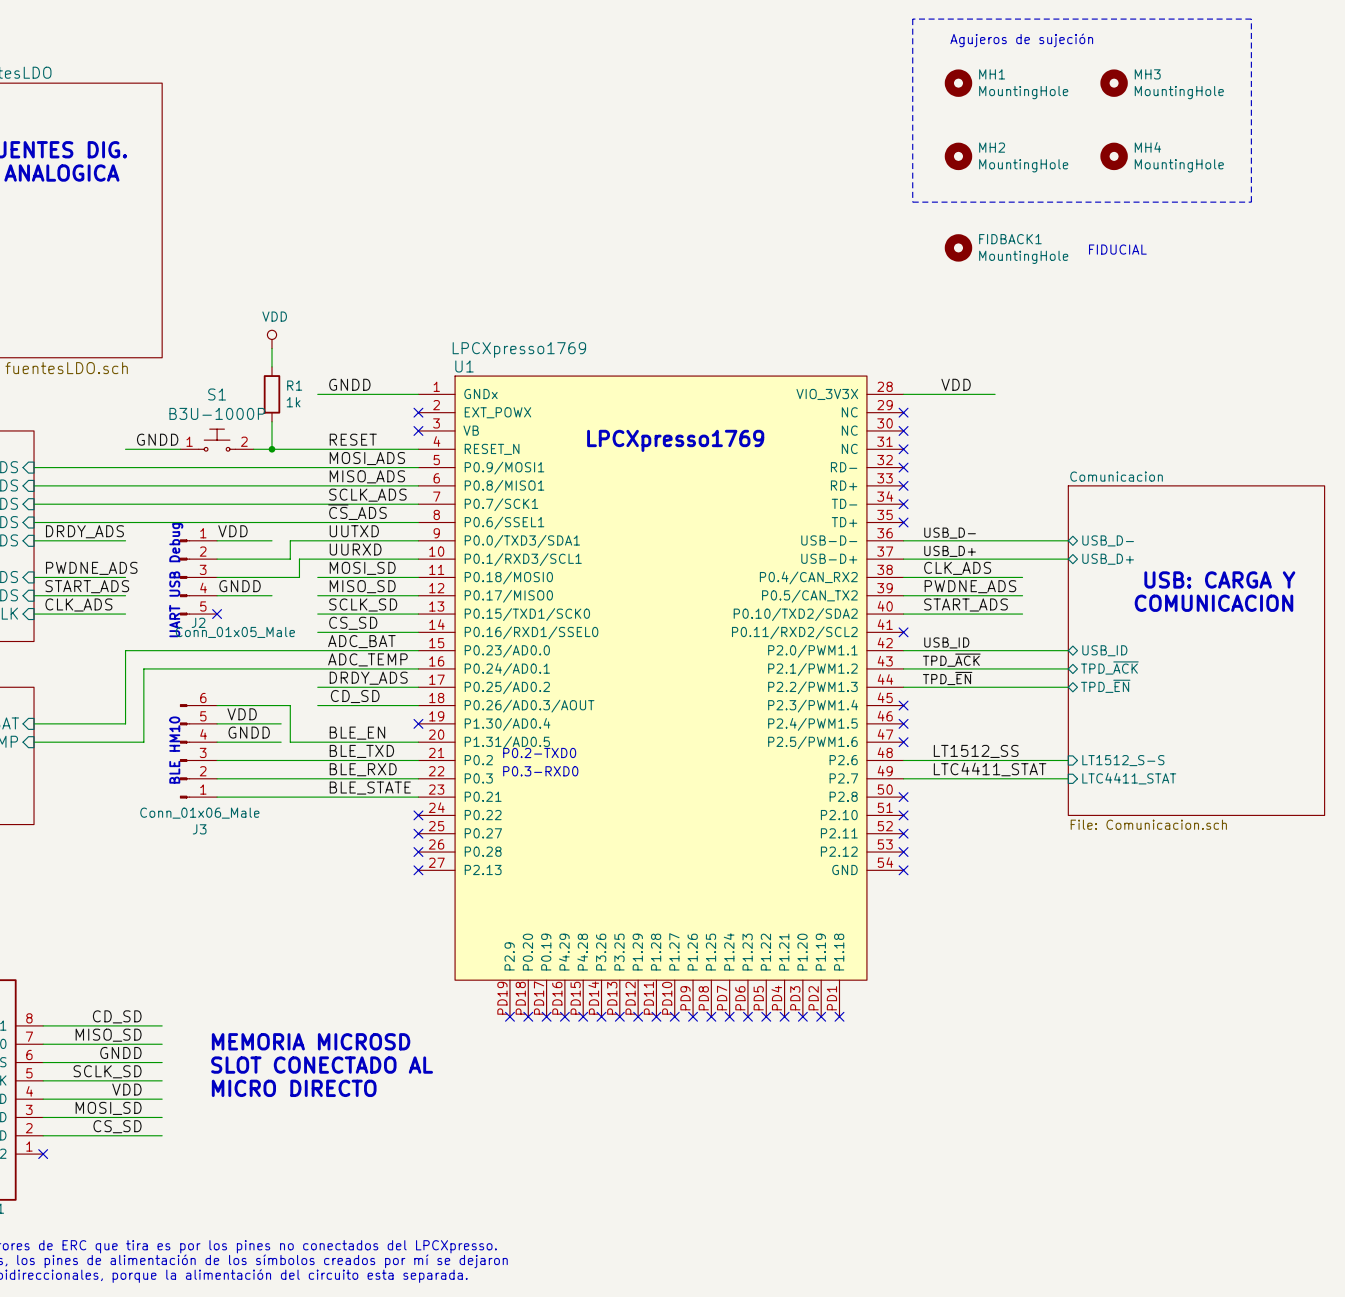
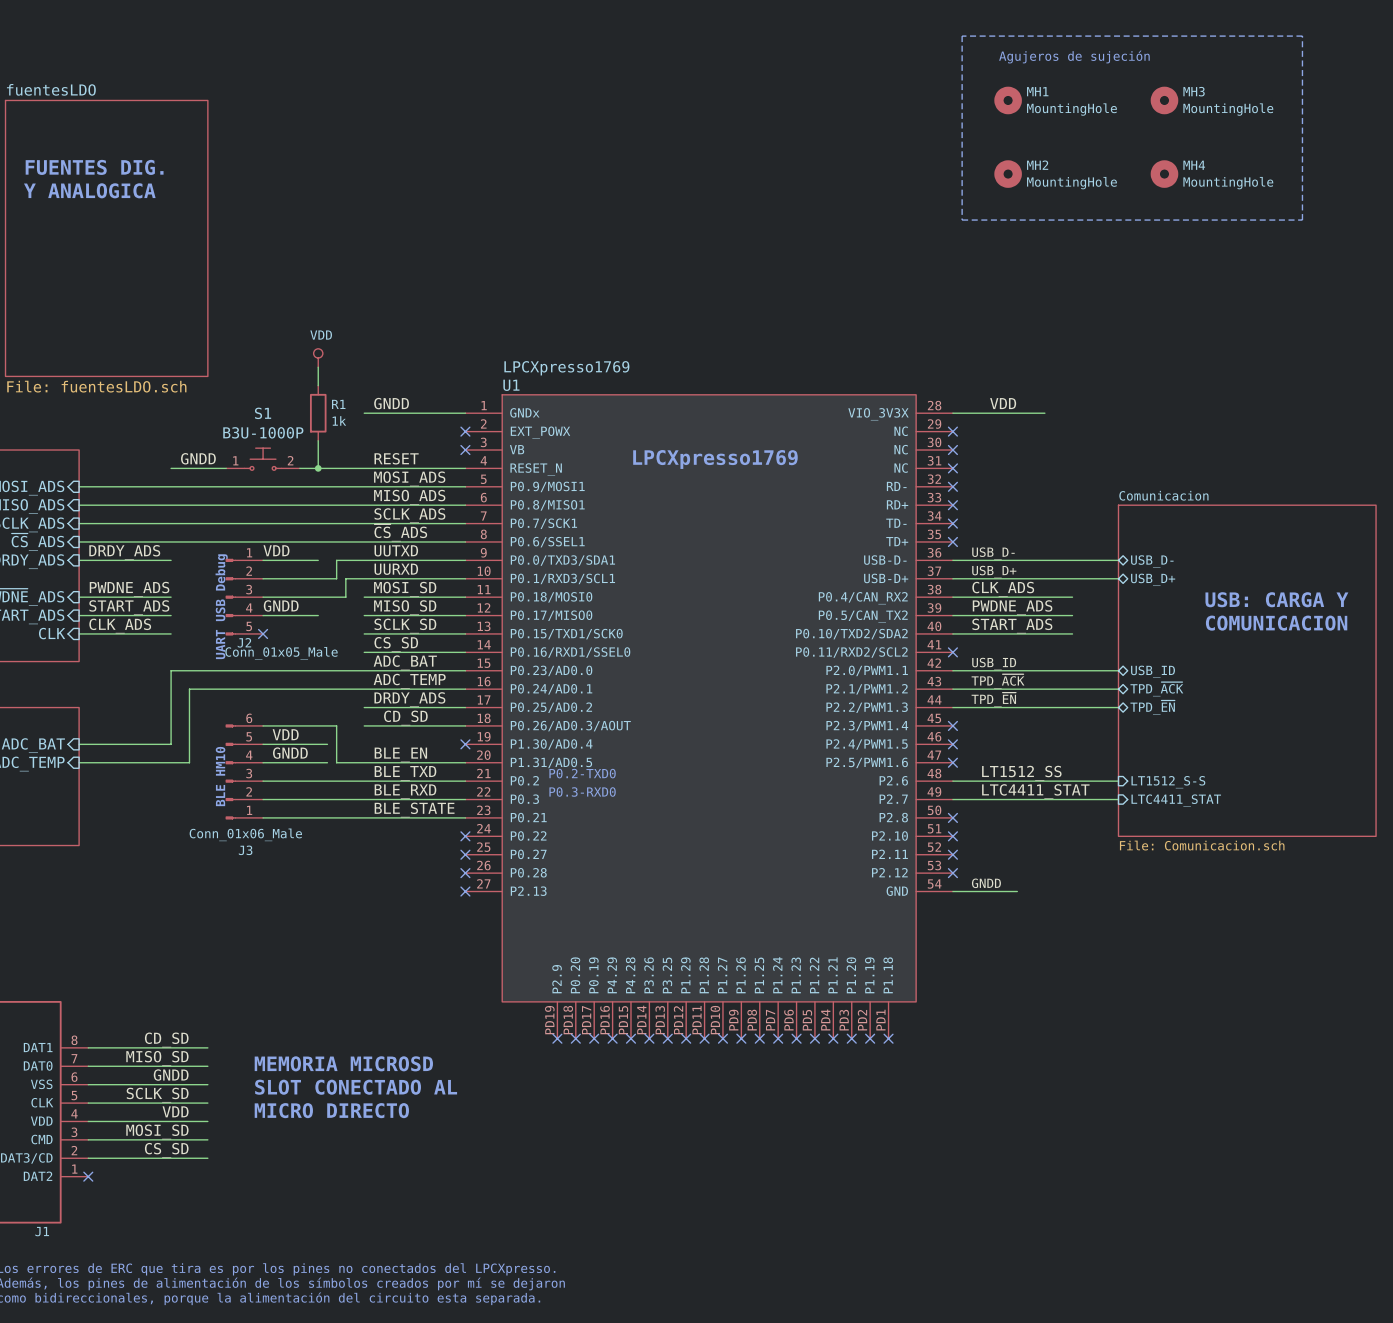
FIDBACK1: MountingHole (958, 247) -> none
text: FIDUCIAL (1117, 249) -> none
label: none -> GNDD (986, 883)
wire: none -> (952, 891) (1017, 891)
no-connect mark: (903, 870) -> none

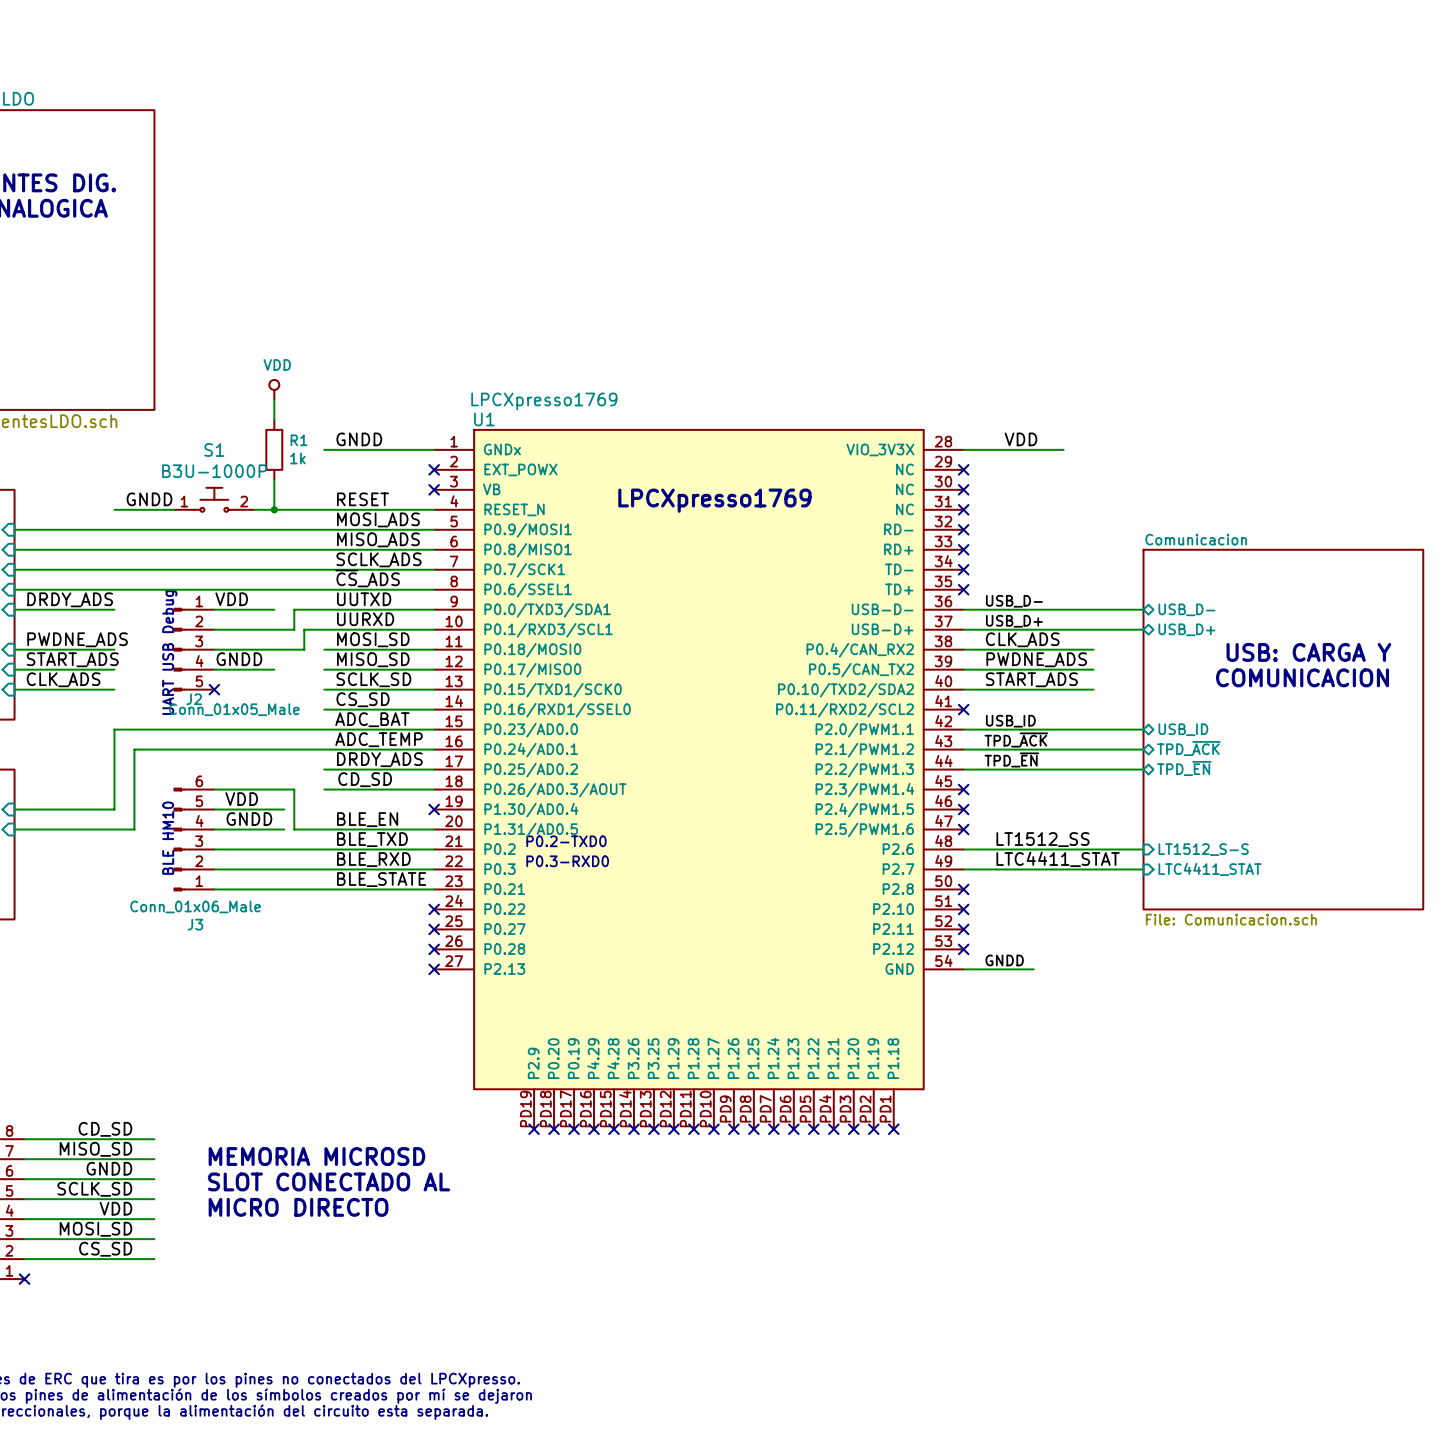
line: (962, 36) (1302, 36) (1302, 220) (962, 220) (962, 36) -> none
text: Agujeros de sujeción (1074, 57) -> none
MH1: MountingHole (1008, 100) -> none
MH3: MountingHole (1164, 100) -> none
MH2: MountingHole (1008, 174) -> none
MH4: MountingHole (1164, 174) -> none

